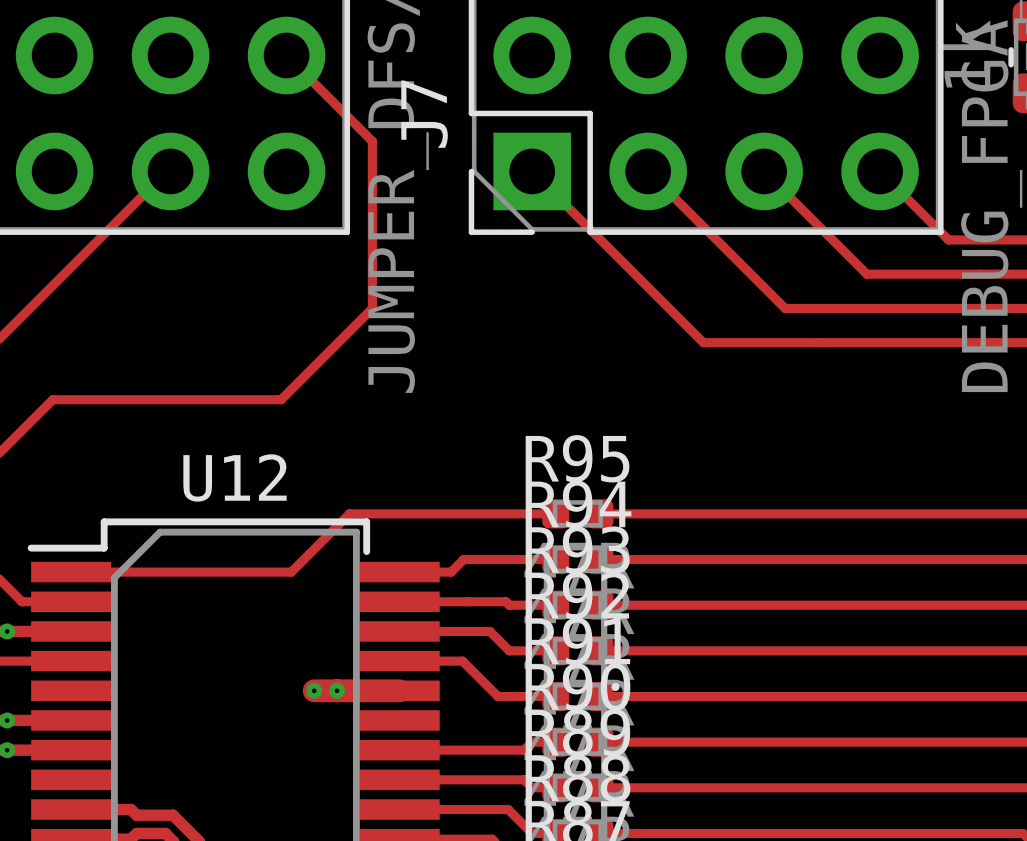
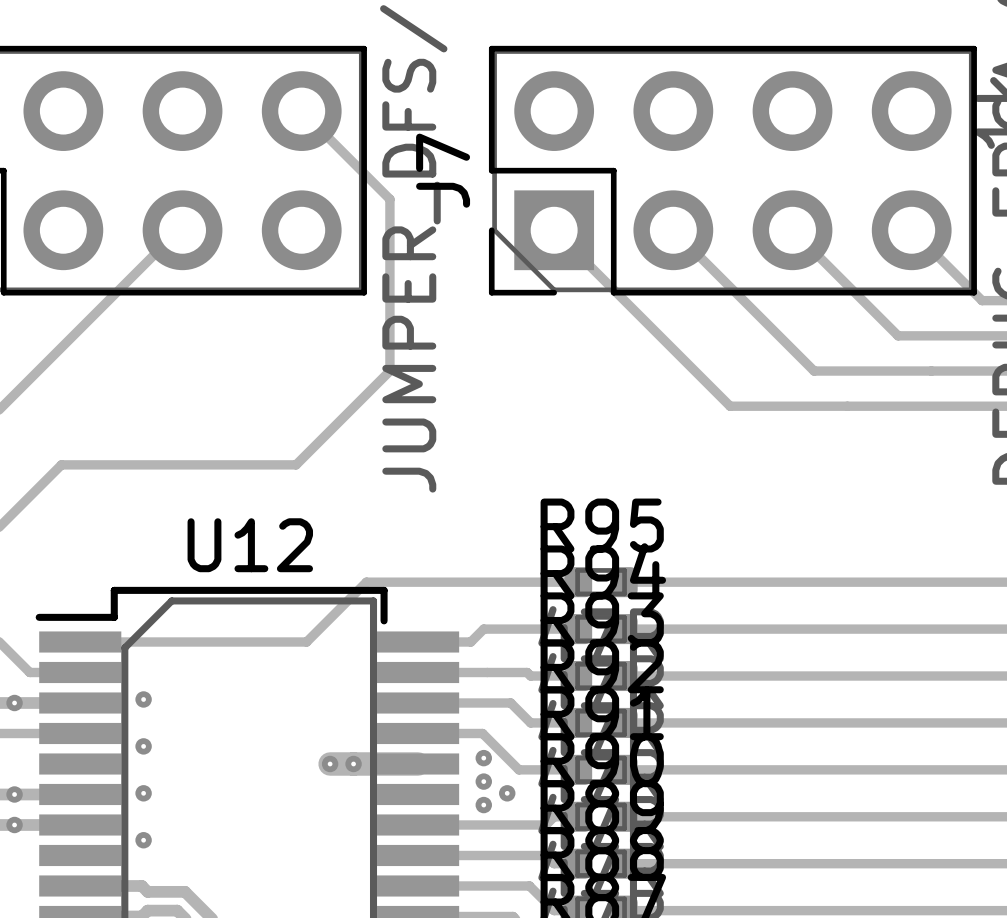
via: none -> (143, 699)
via: none -> (143, 746)
via: none -> (483, 758)
via: none -> (483, 781)
via: none -> (143, 793)
via: none -> (507, 793)
via: none -> (483, 805)
via: none -> (143, 840)

